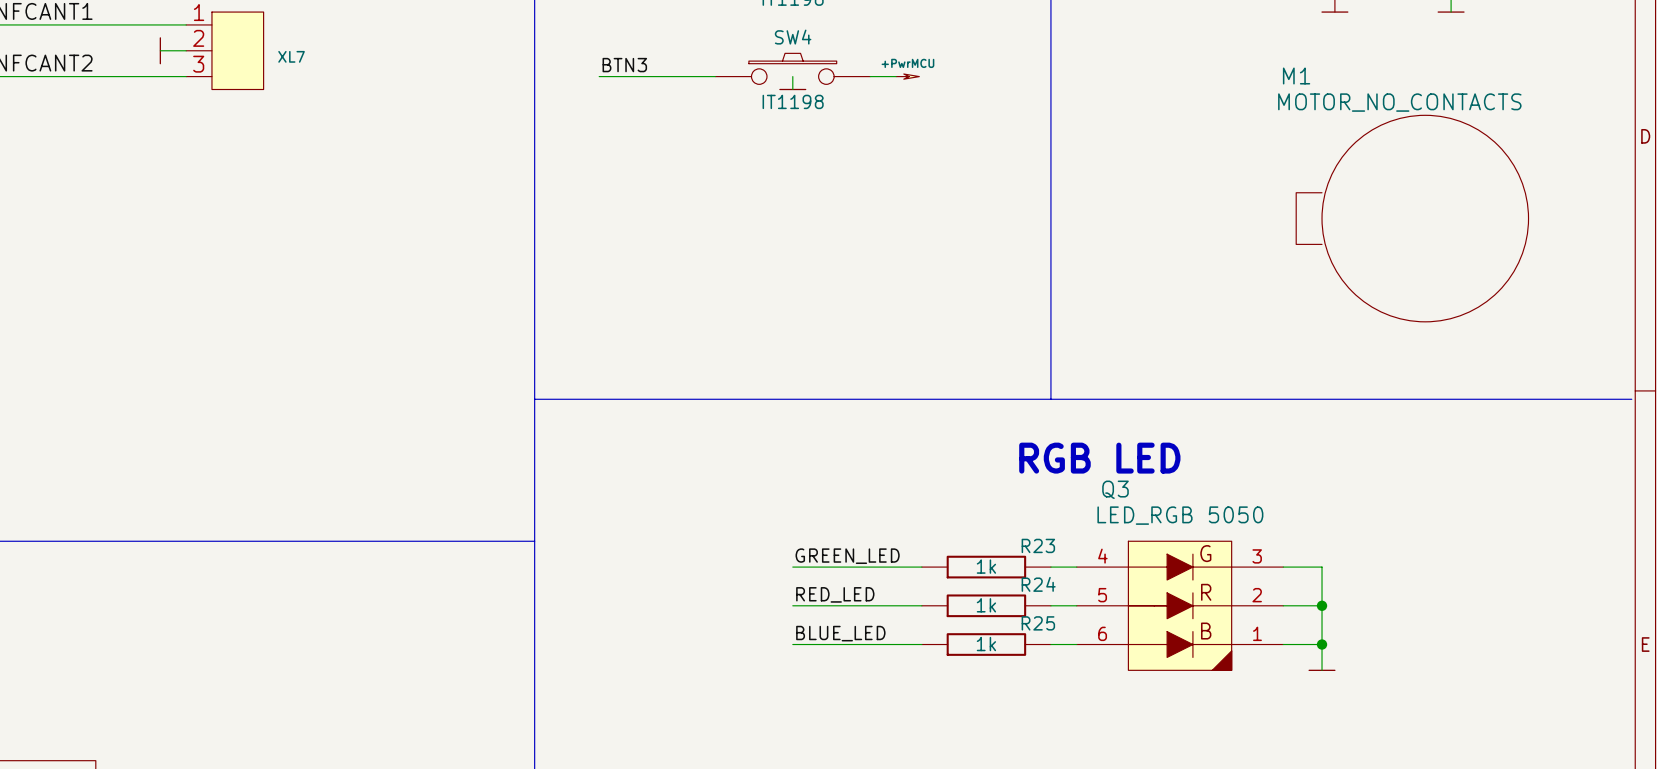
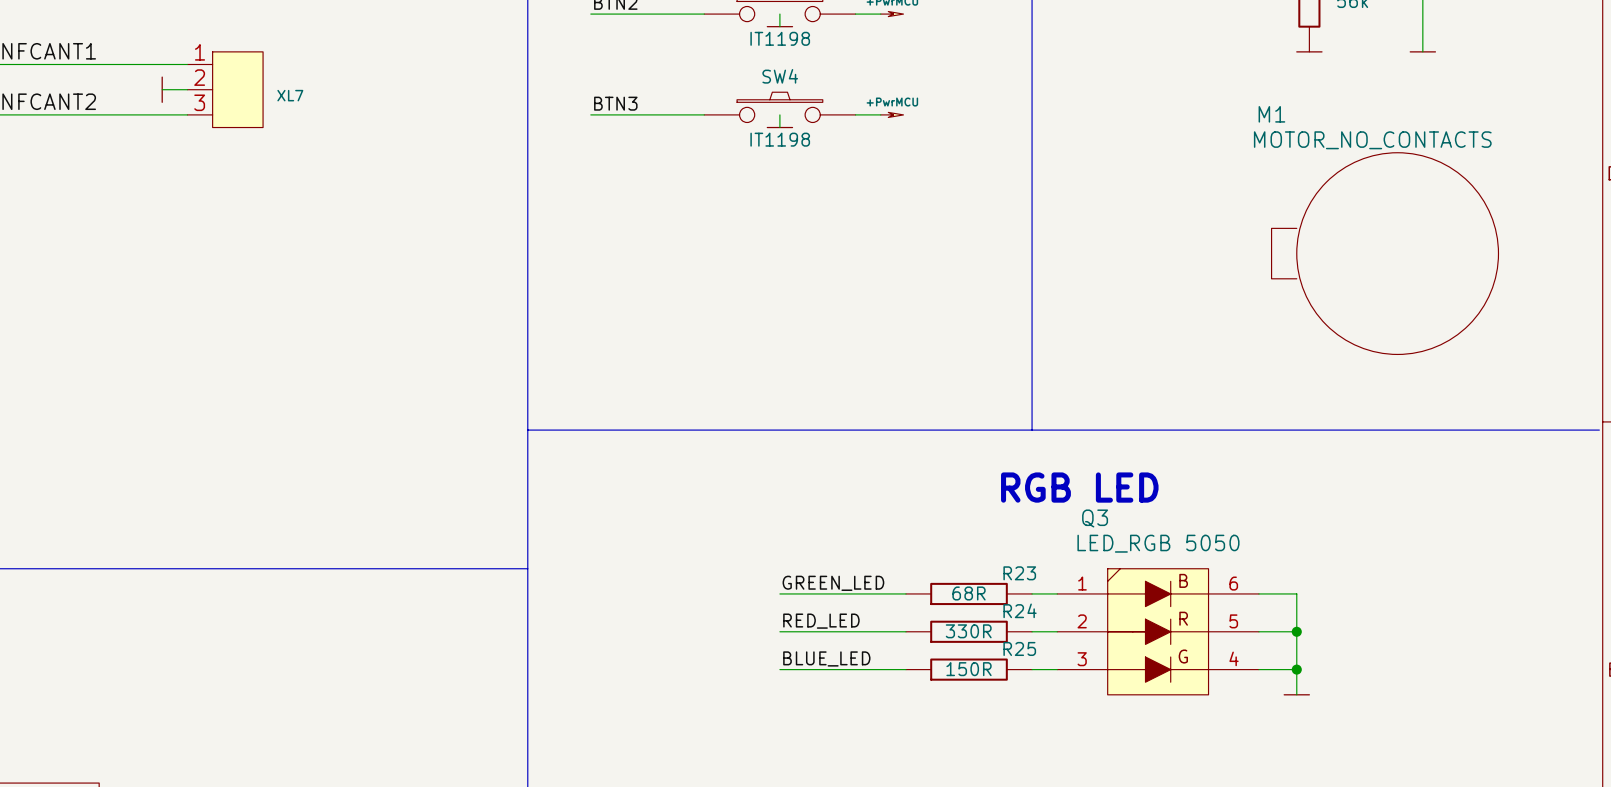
Q3 symbol: [1076, 541, 1284, 671] -> [1057, 568, 1259, 695]
R23 value: 1k (986, 566) -> 68R (969, 593)
R24 value: 1k (986, 605) -> 330R (968, 631)
R25 value: 1k (986, 644) -> 150R (969, 669)

